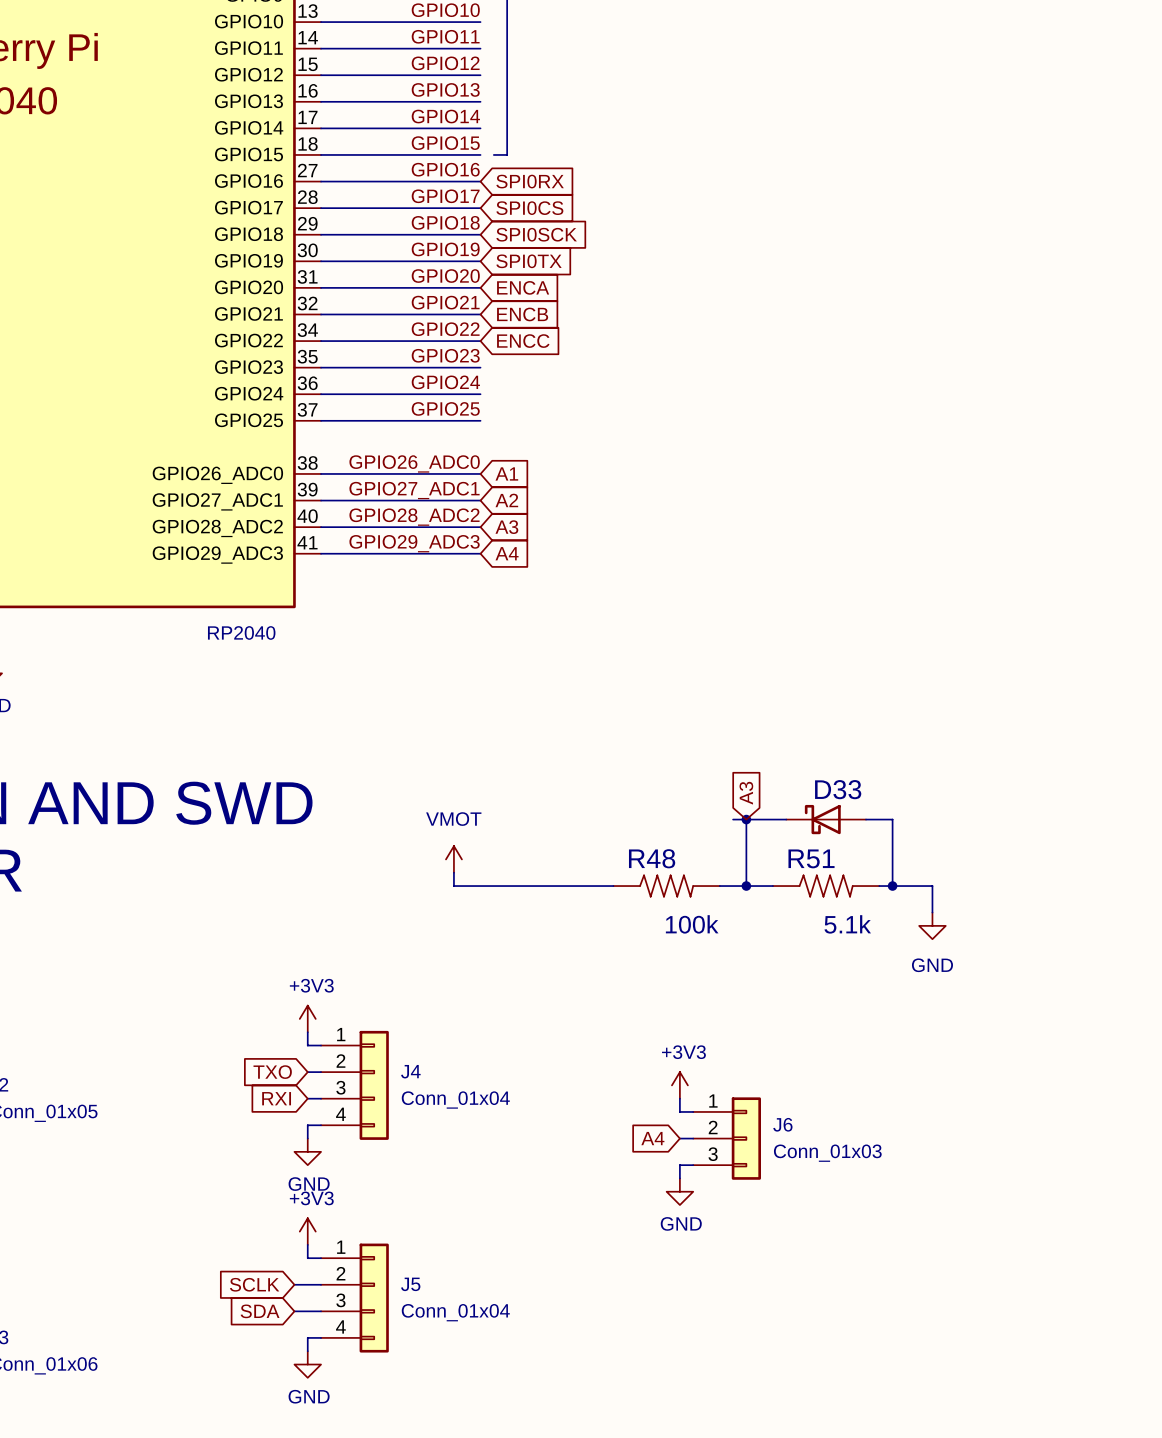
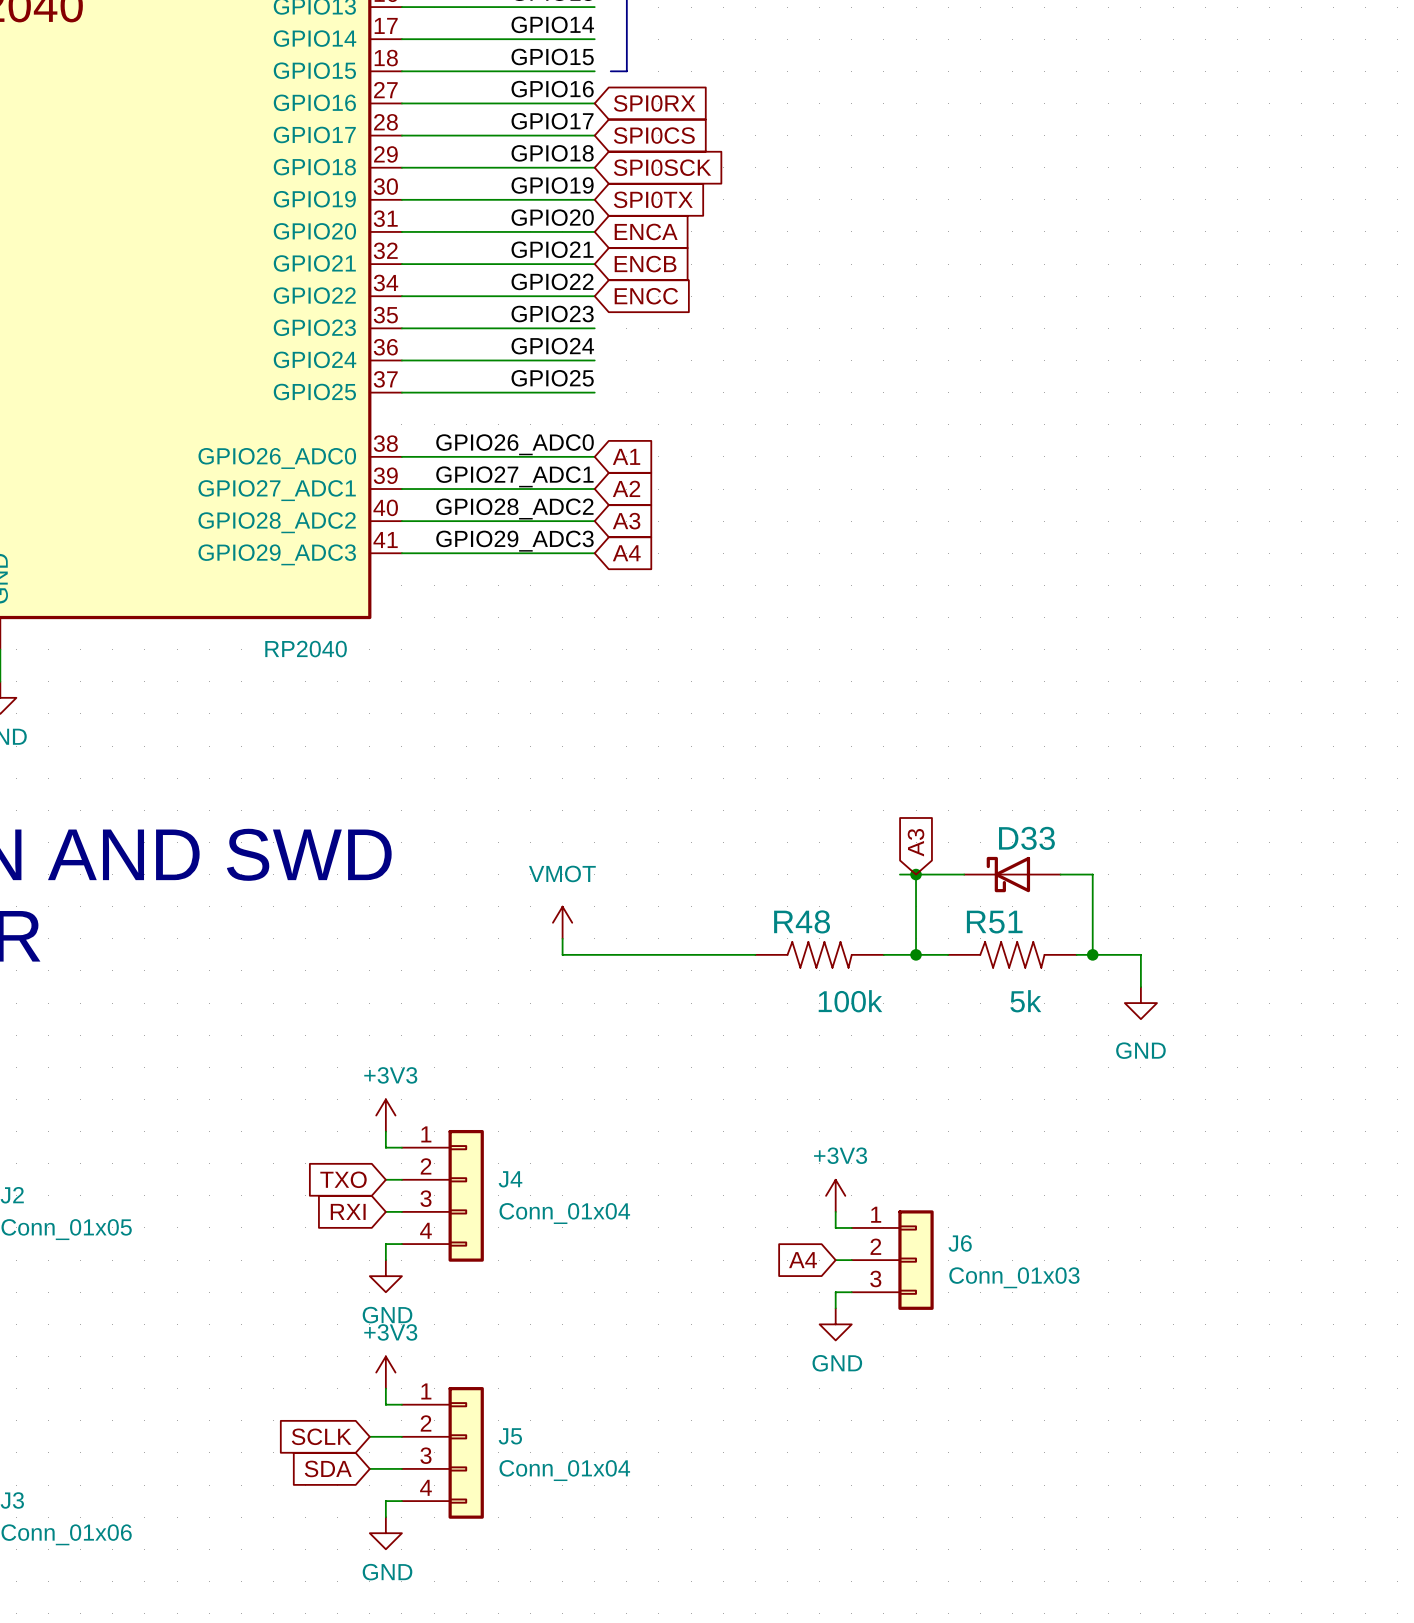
R51 value: 5.1k (847, 924) -> 5k (1025, 1001)

